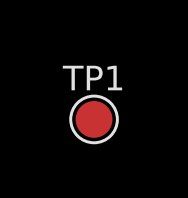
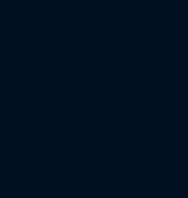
TP1: (94, 119) -> none

